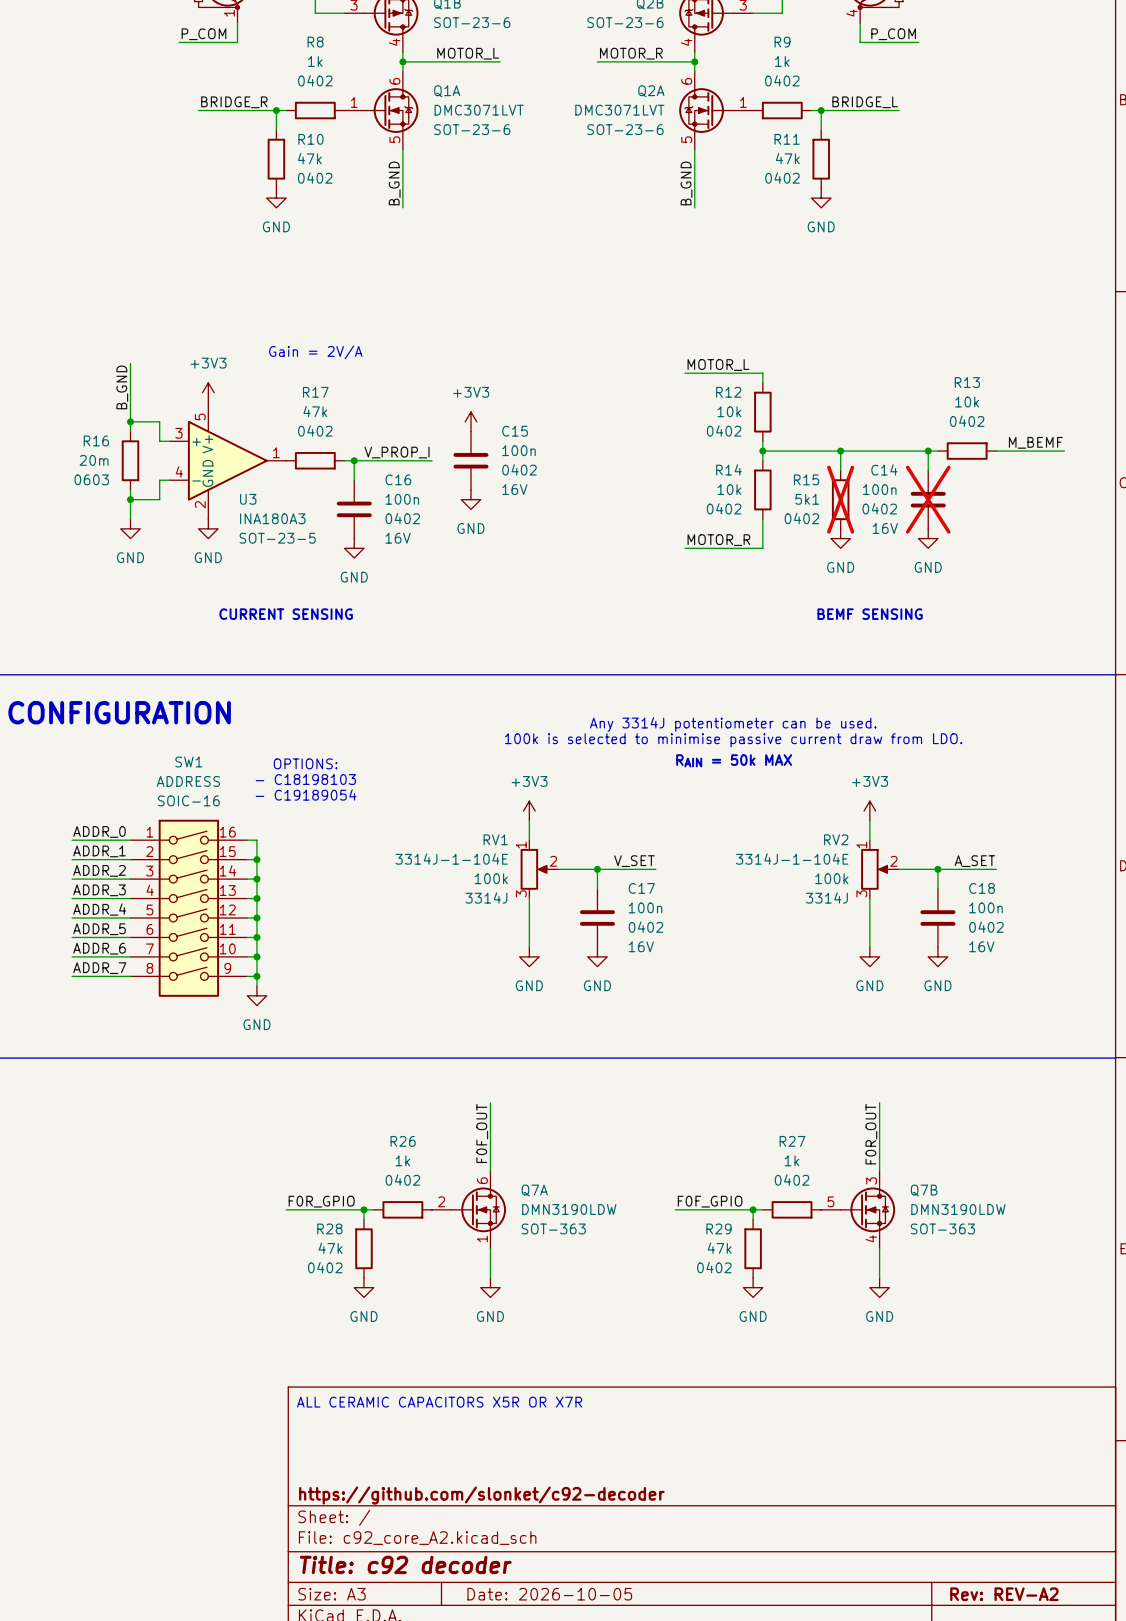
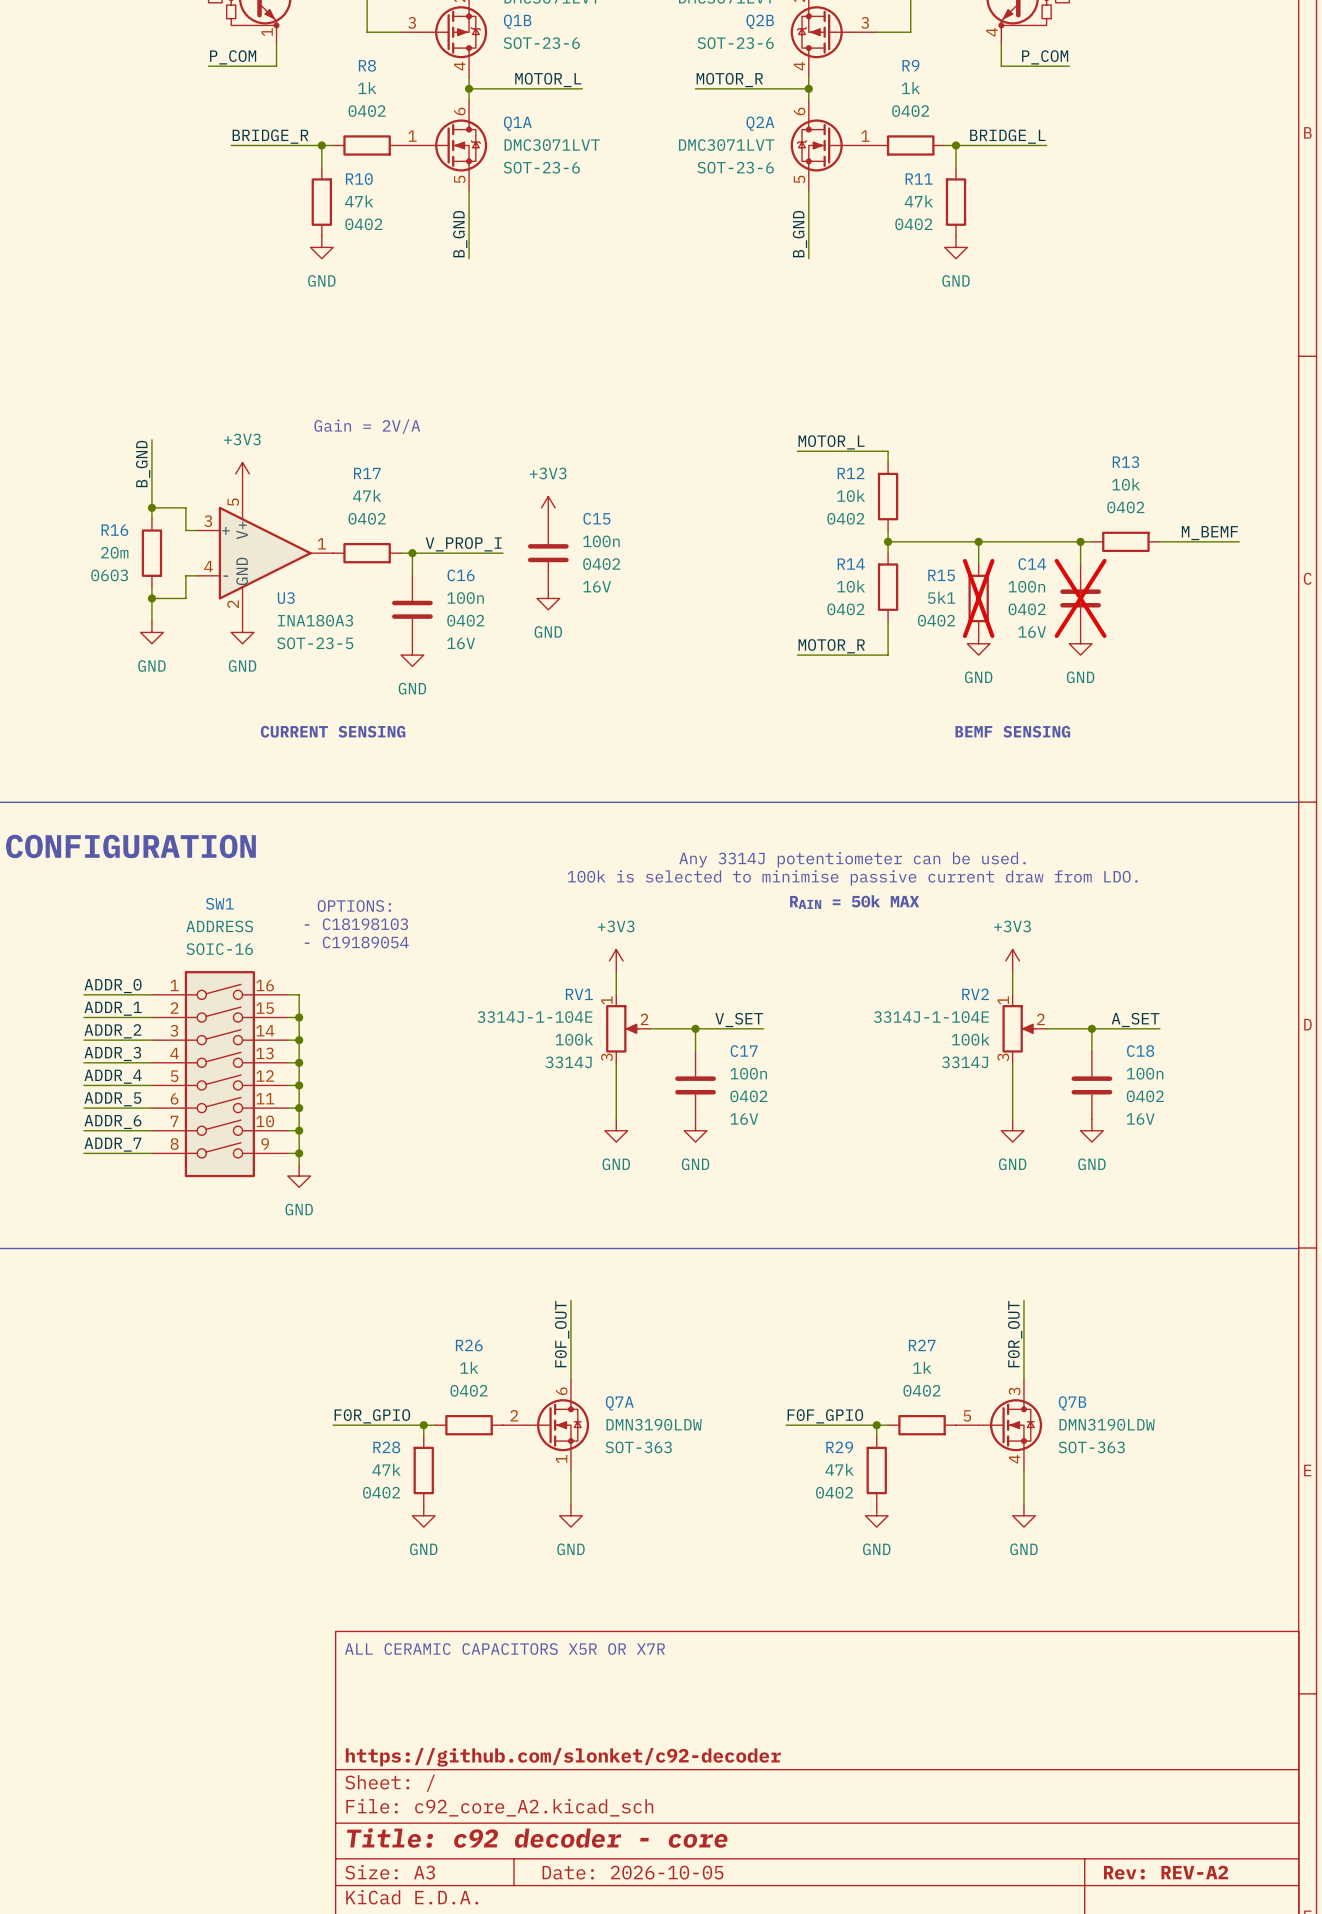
title block: Title: c92 decoder (405, 1564) -> Title: c92 decoder - core (537, 1838)

